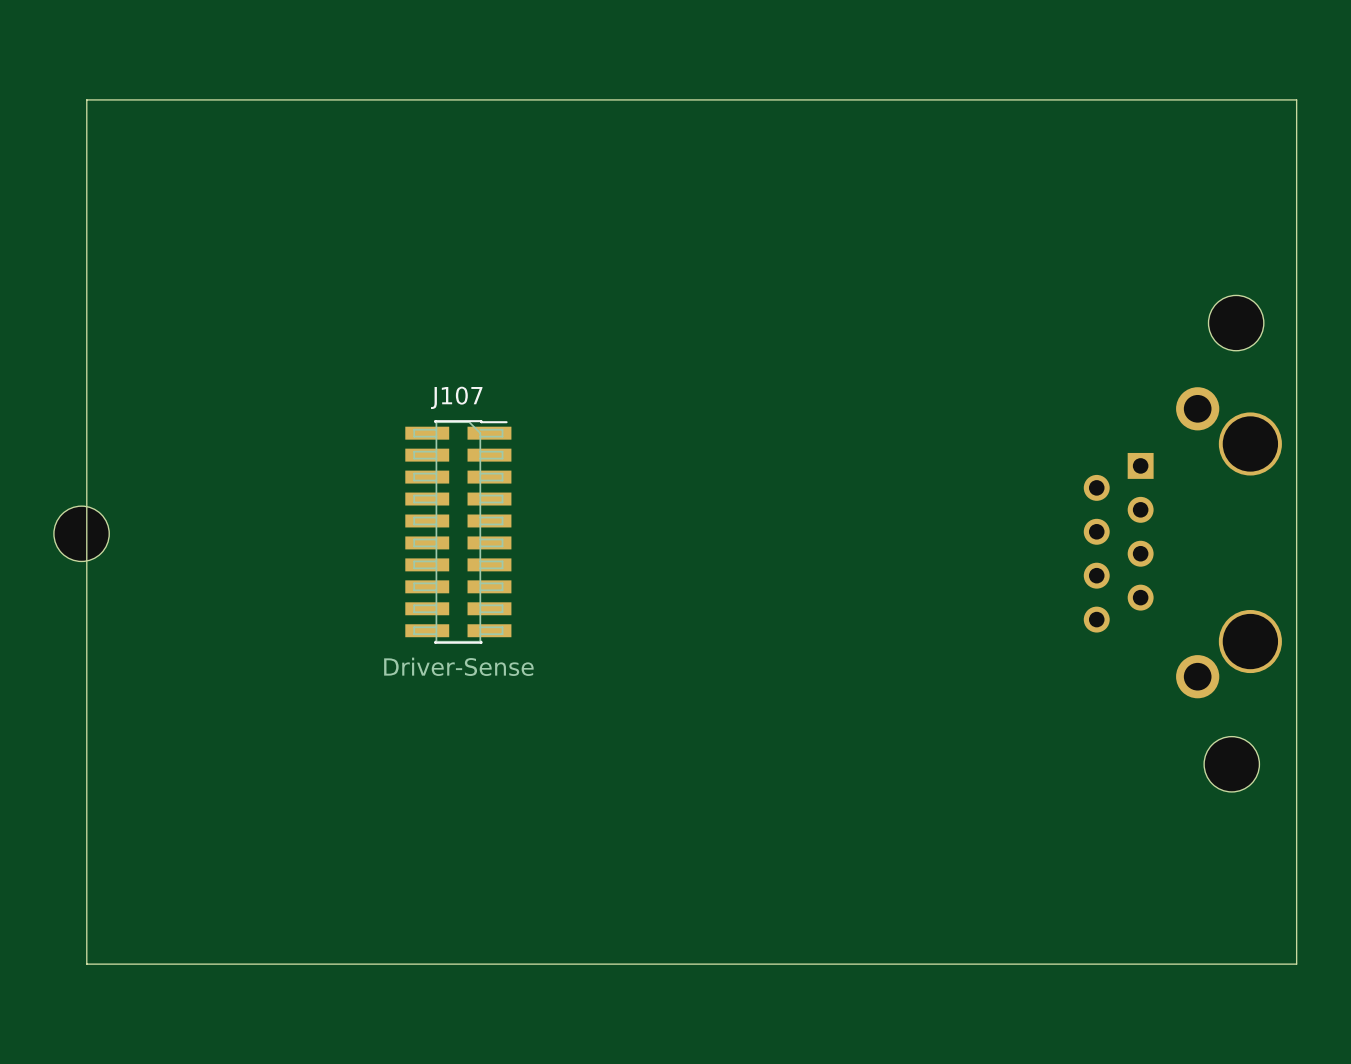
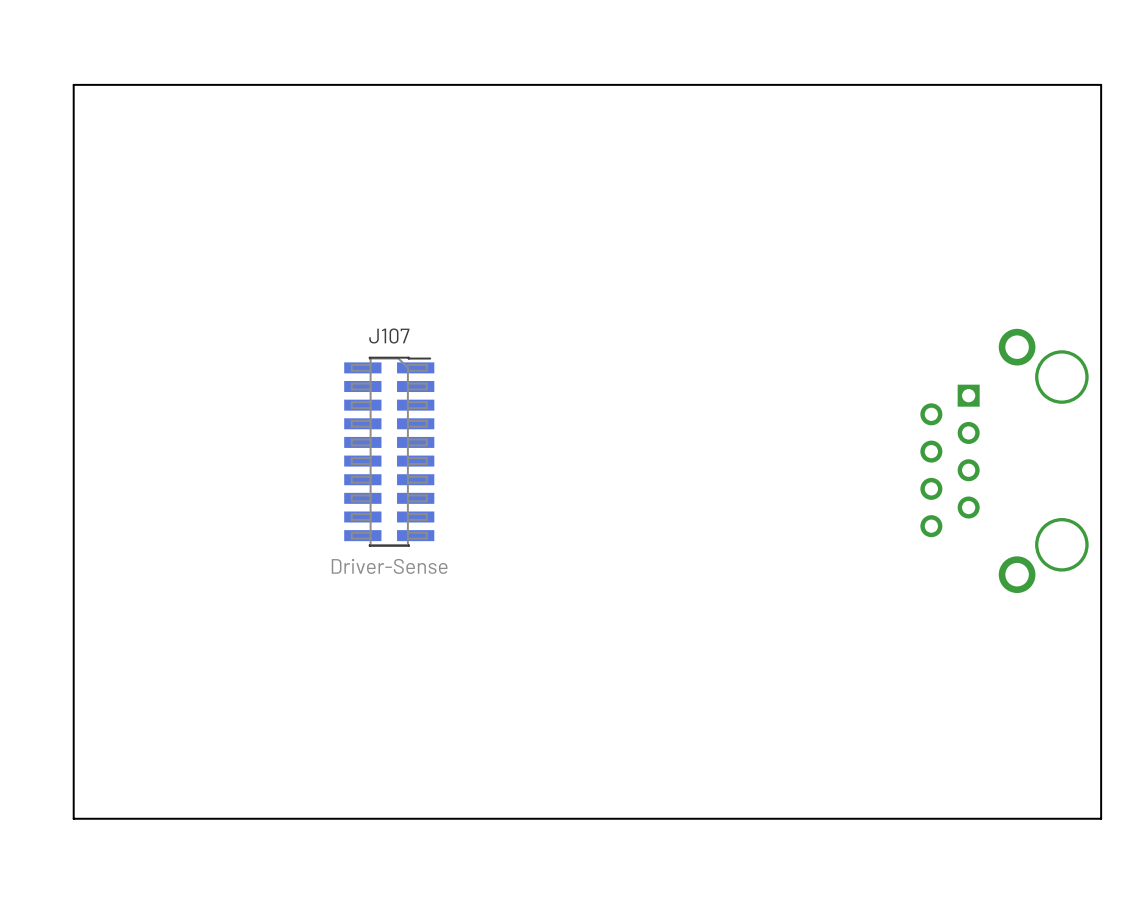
part: (1236, 323) -> none
part: (81, 533) -> none
part: (1231, 764) -> none

